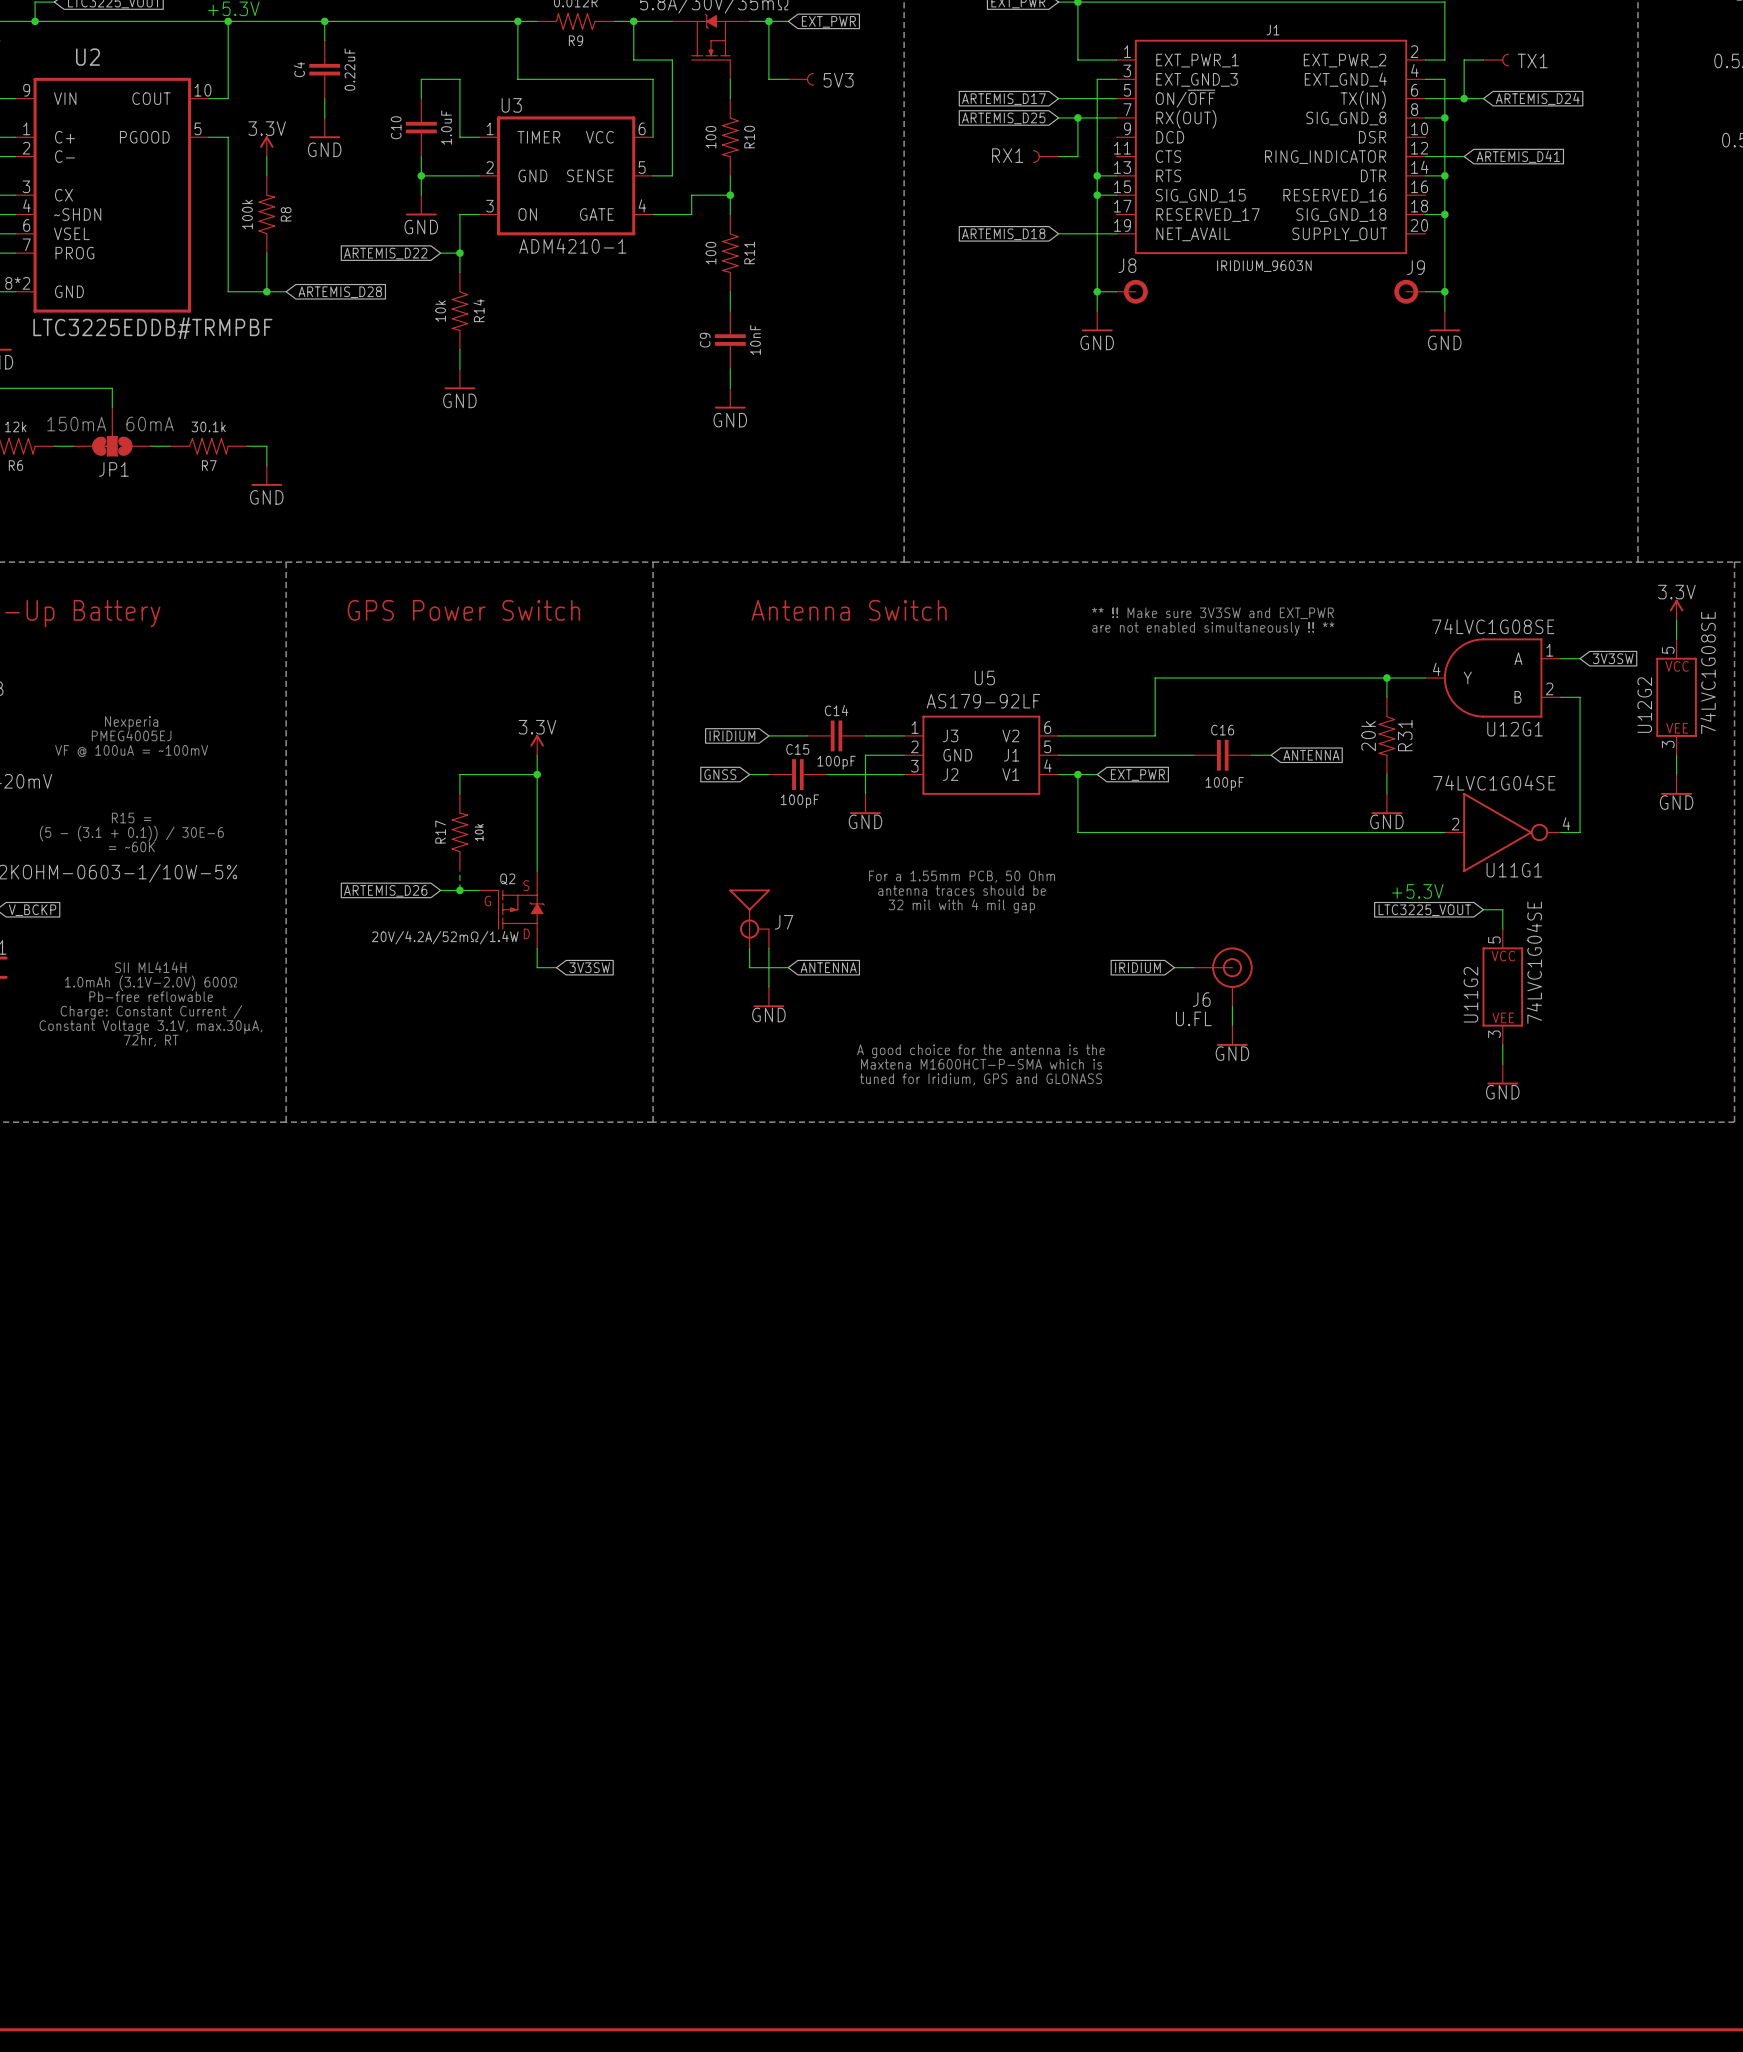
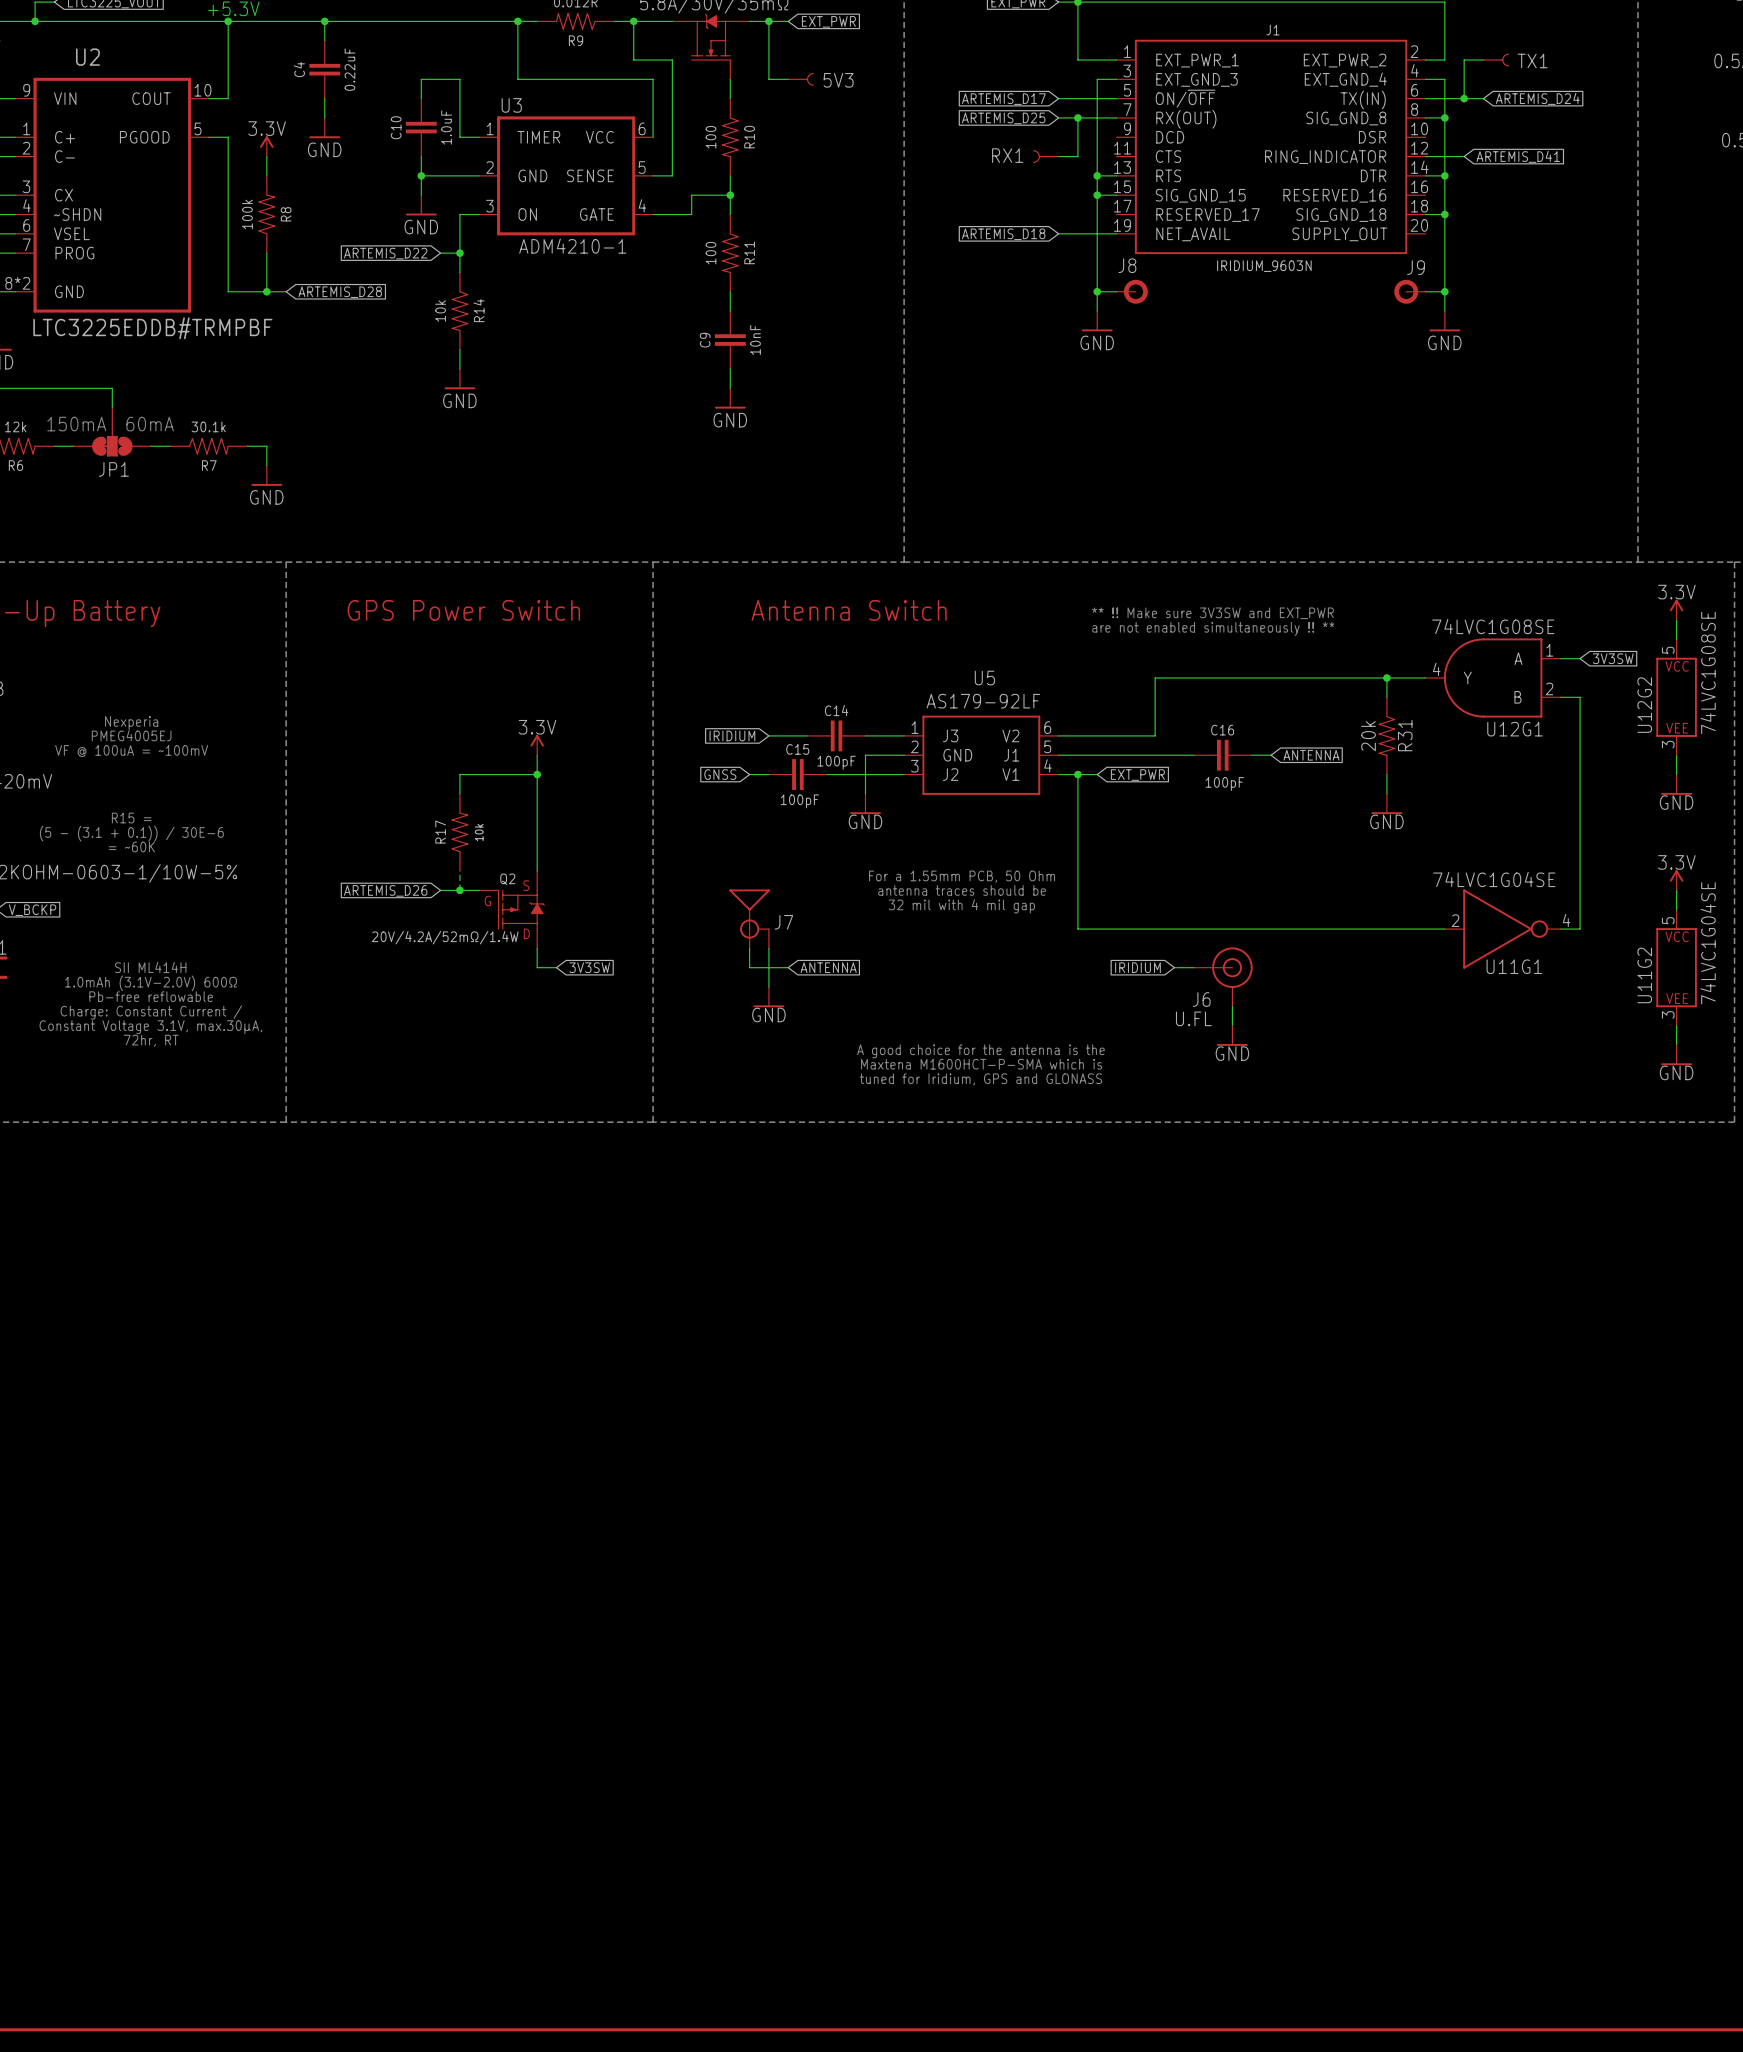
wire: (1077, 832) (1444, 832) -> (1077, 832) (1077, 929) (1444, 929)
U11G1 position: (1503, 832) -> (1503, 929)
wire: (1560, 832) (1580, 832) -> (1560, 929) (1580, 929) (1580, 832)
power symbol: none -> 3.3V (1676, 880)
wire: none -> (1676, 890) (1676, 909)
text: +5.3V (1417, 891) -> none
wire: (1483, 909) (1502, 909) (1502, 929) -> none
global label: LTC3225_VOUT (1424, 910) -> none
U11G2 position: (1502, 986) -> (1676, 967)
wire: (1502, 1044) (1502, 1064) -> (1676, 1025) (1676, 1044)
power symbol position: GND (1502, 1074) -> GND (1676, 1055)

